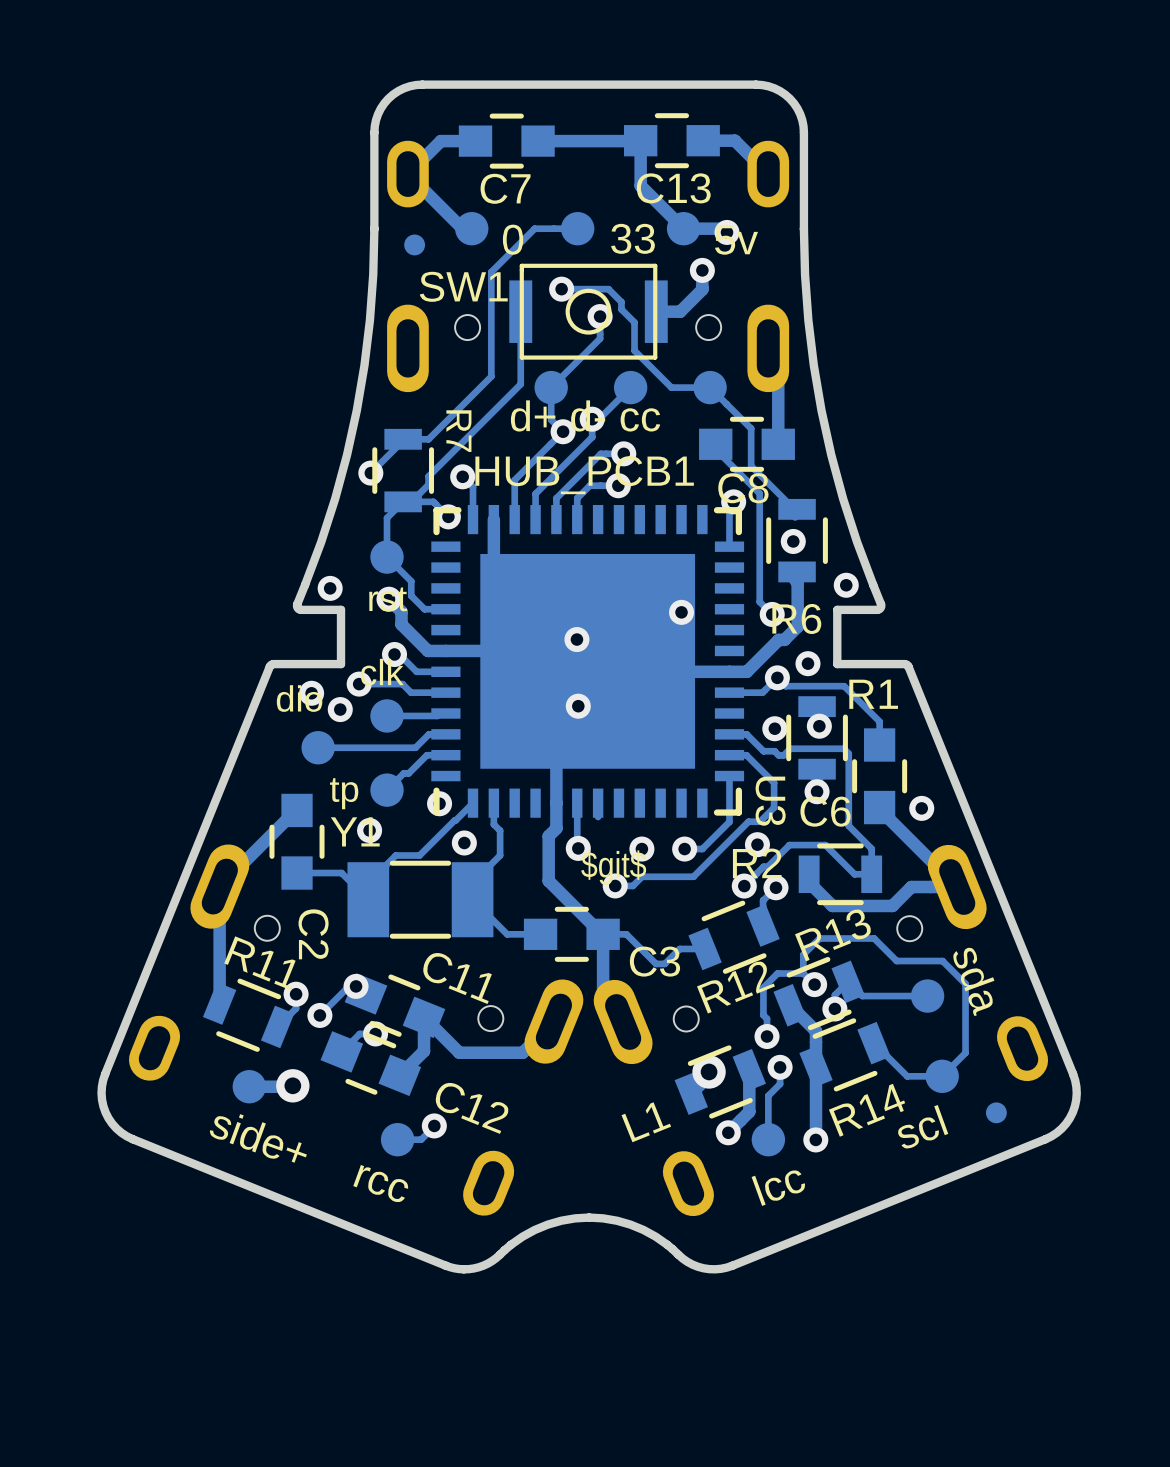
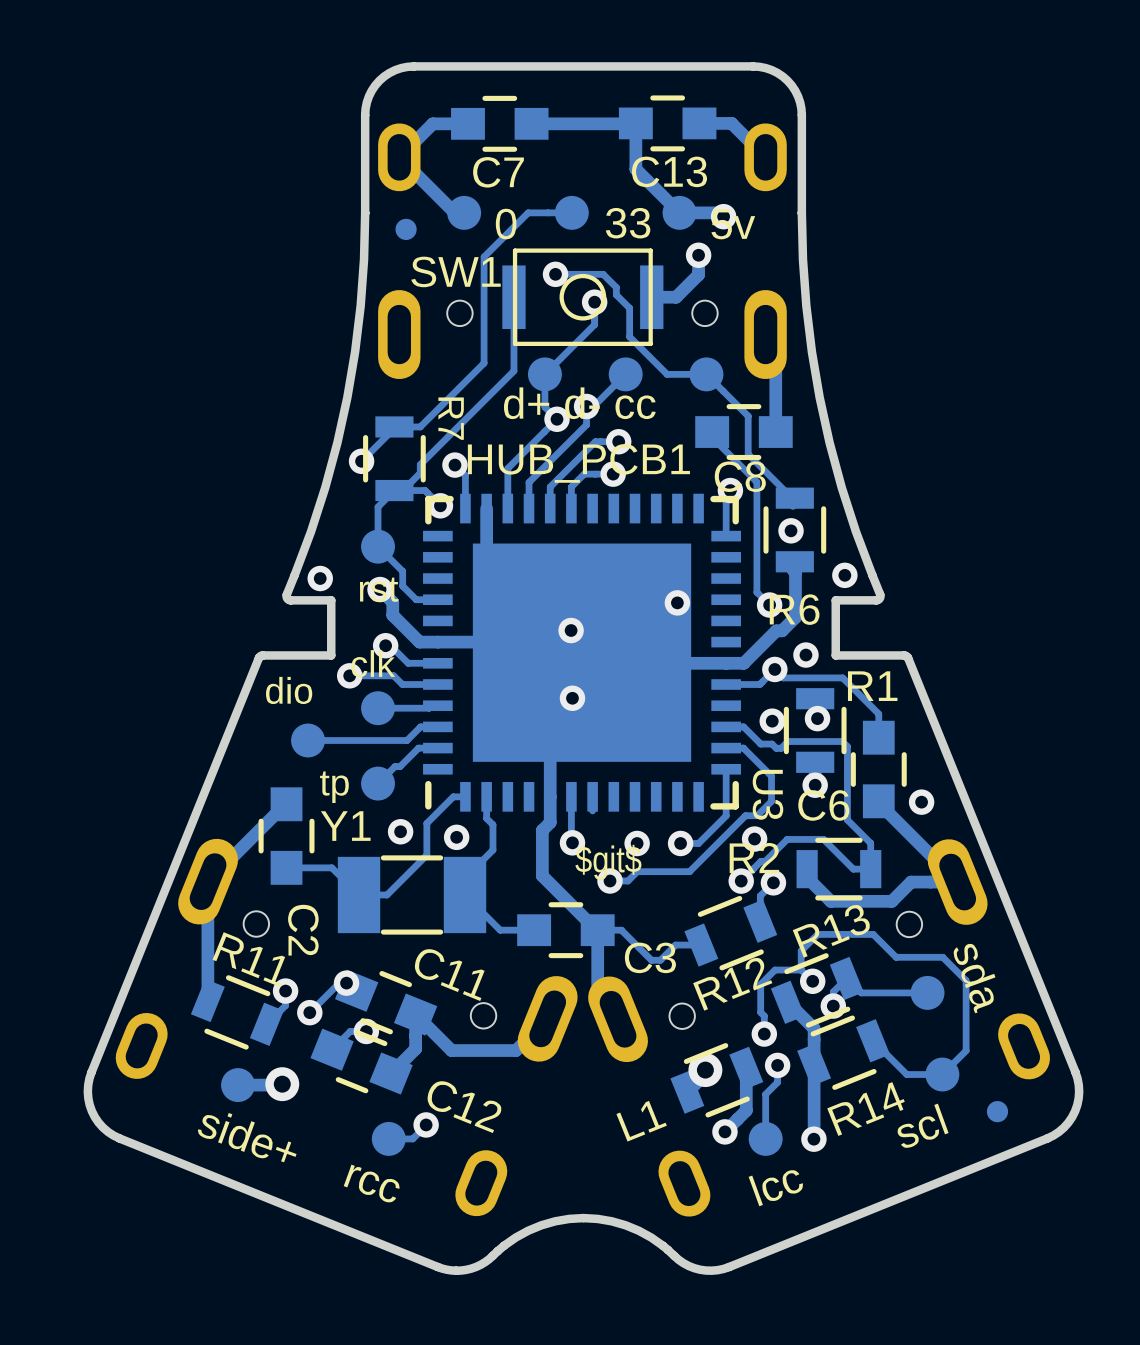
via: (311, 693) -> none
via: (340, 709) -> none
via: (439, 803) -> none
track: (473, 803) (419, 855) (395, 855) (368, 883) (368, 899) -> (465, 796) (453, 796) (426, 823) (426, 855) (387, 894) (359, 894)
via: (369, 830) -> none
via: none -> (400, 831)

